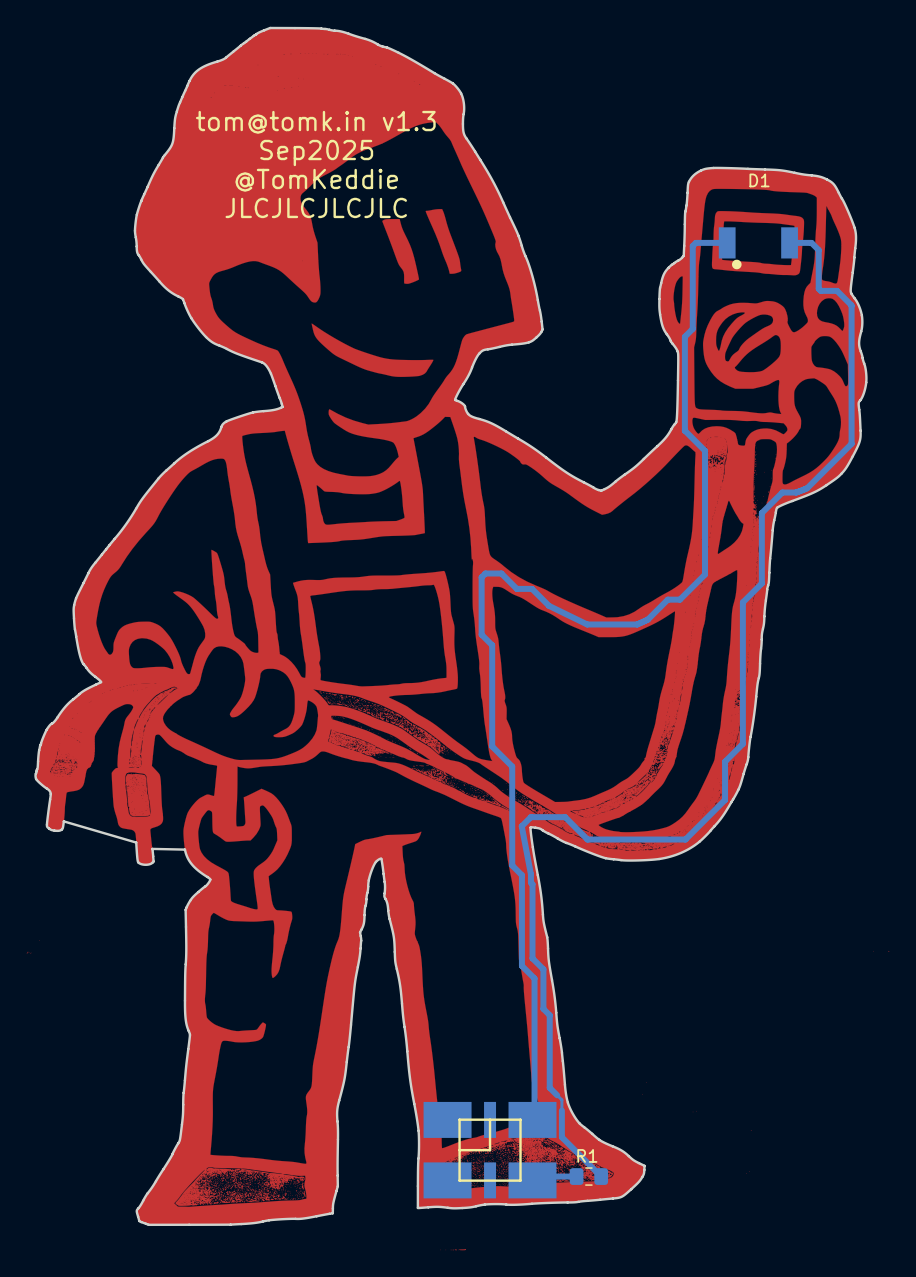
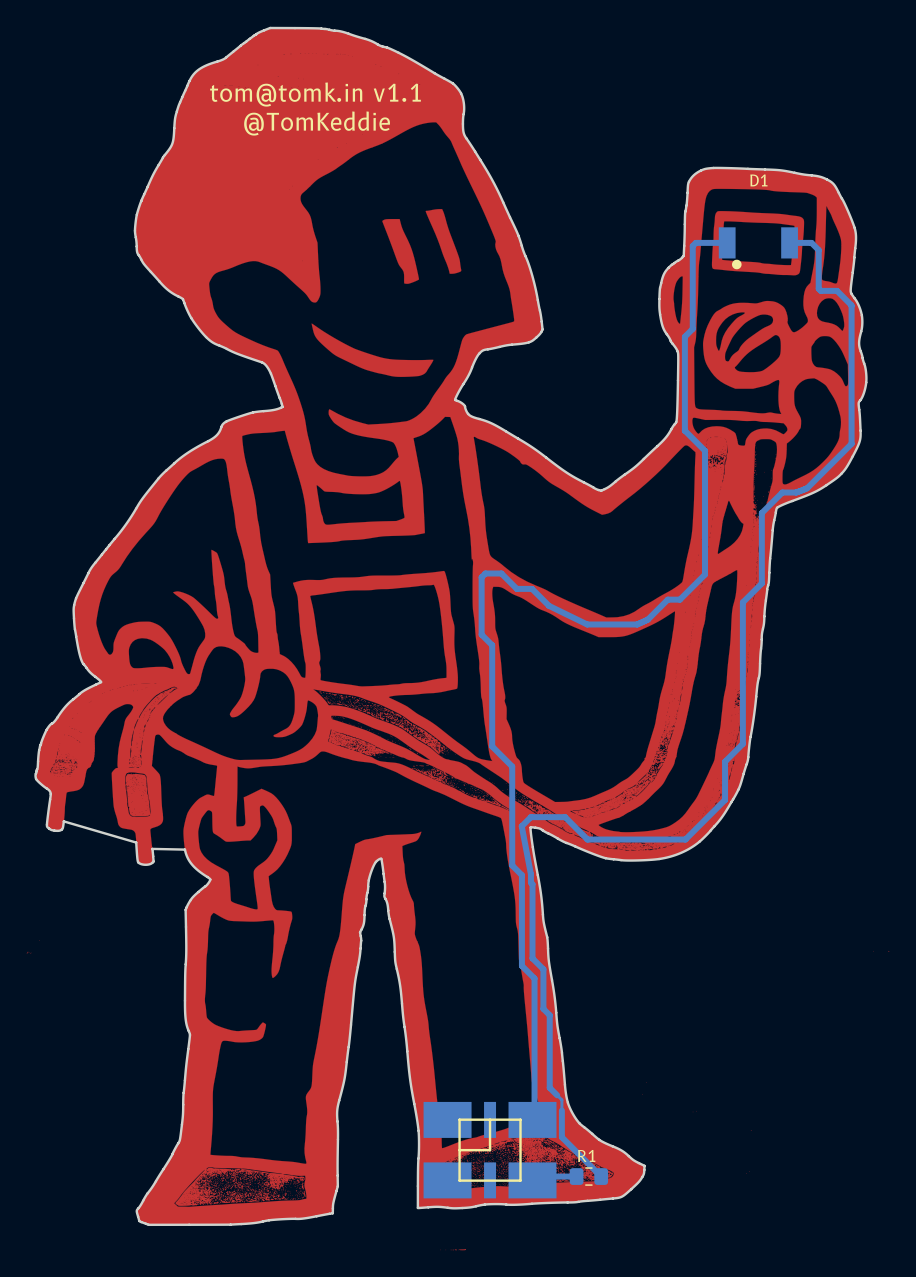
text: none -> tom@tomk.in v1.1 (315, 94)
text: tom@tomk.in v1.3 (315, 122) -> @TomKeddie (317, 123)
text: Sep2025 (316, 153) -> none
text: @TomKeddie (316, 180) -> none
text: JLCJLCJLCJLC (316, 207) -> none

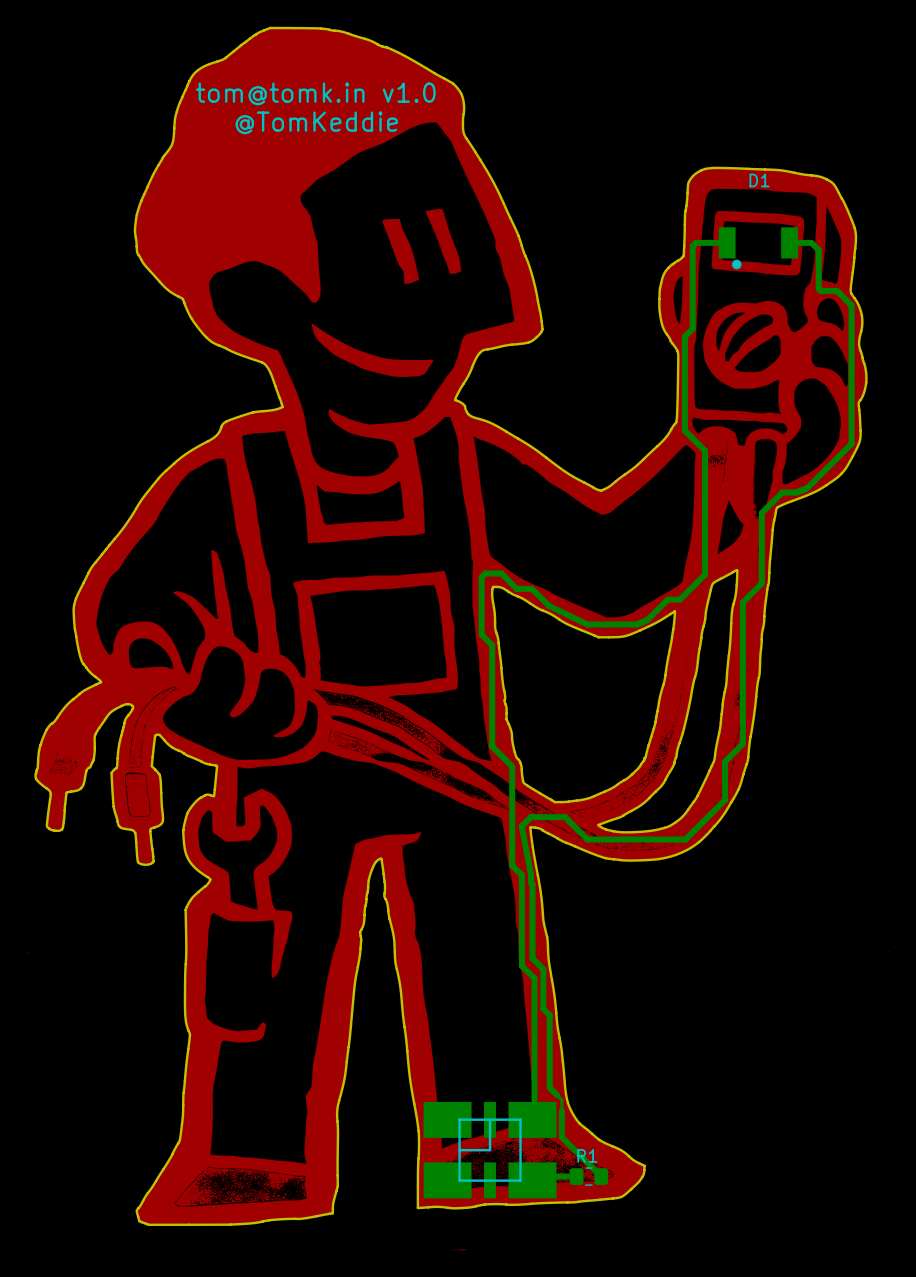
text: tom@tomk.in v1.1 (315, 94) -> tom@tomk.in v1.0 (315, 93)
board edge: none -> (737, 570) (719, 729) (714, 760) (697, 796) (682, 816) (666, 827) (649, 831) (626, 832) (602, 827) (598, 824) (621, 816) (645, 801) (662, 784) (672, 766) (688, 708) (711, 585) (715, 581) (737, 570)
board edge: none -> (496, 586) (493, 586) (492, 597) (506, 719) (511, 731) (515, 755) (520, 764) (523, 782) (555, 802) (586, 798) (612, 787) (631, 775) (645, 757) (664, 678) (674, 611) (655, 623) (629, 634) (598, 637) (567, 624) (503, 588) (496, 586)
board edge: (63, 821) (136, 842) -> (63, 821) (66, 792) (78, 789) (83, 785) (86, 770) (93, 759) (96, 732) (111, 711) (124, 704) (130, 704) (133, 707) (124, 721) (119, 745) (116, 767) (111, 772) (111, 778) (113, 806) (118, 824) (121, 828) (133, 831) (136, 842)
board edge: (152, 848) (184, 849) -> (152, 848) (150, 829) (160, 824) (163, 819) (160, 776) (151, 766) (155, 736) (157, 734) (170, 746) (187, 755) (216, 766) (213, 796) (207, 794) (199, 798) (187, 814) (183, 830) (184, 849)

